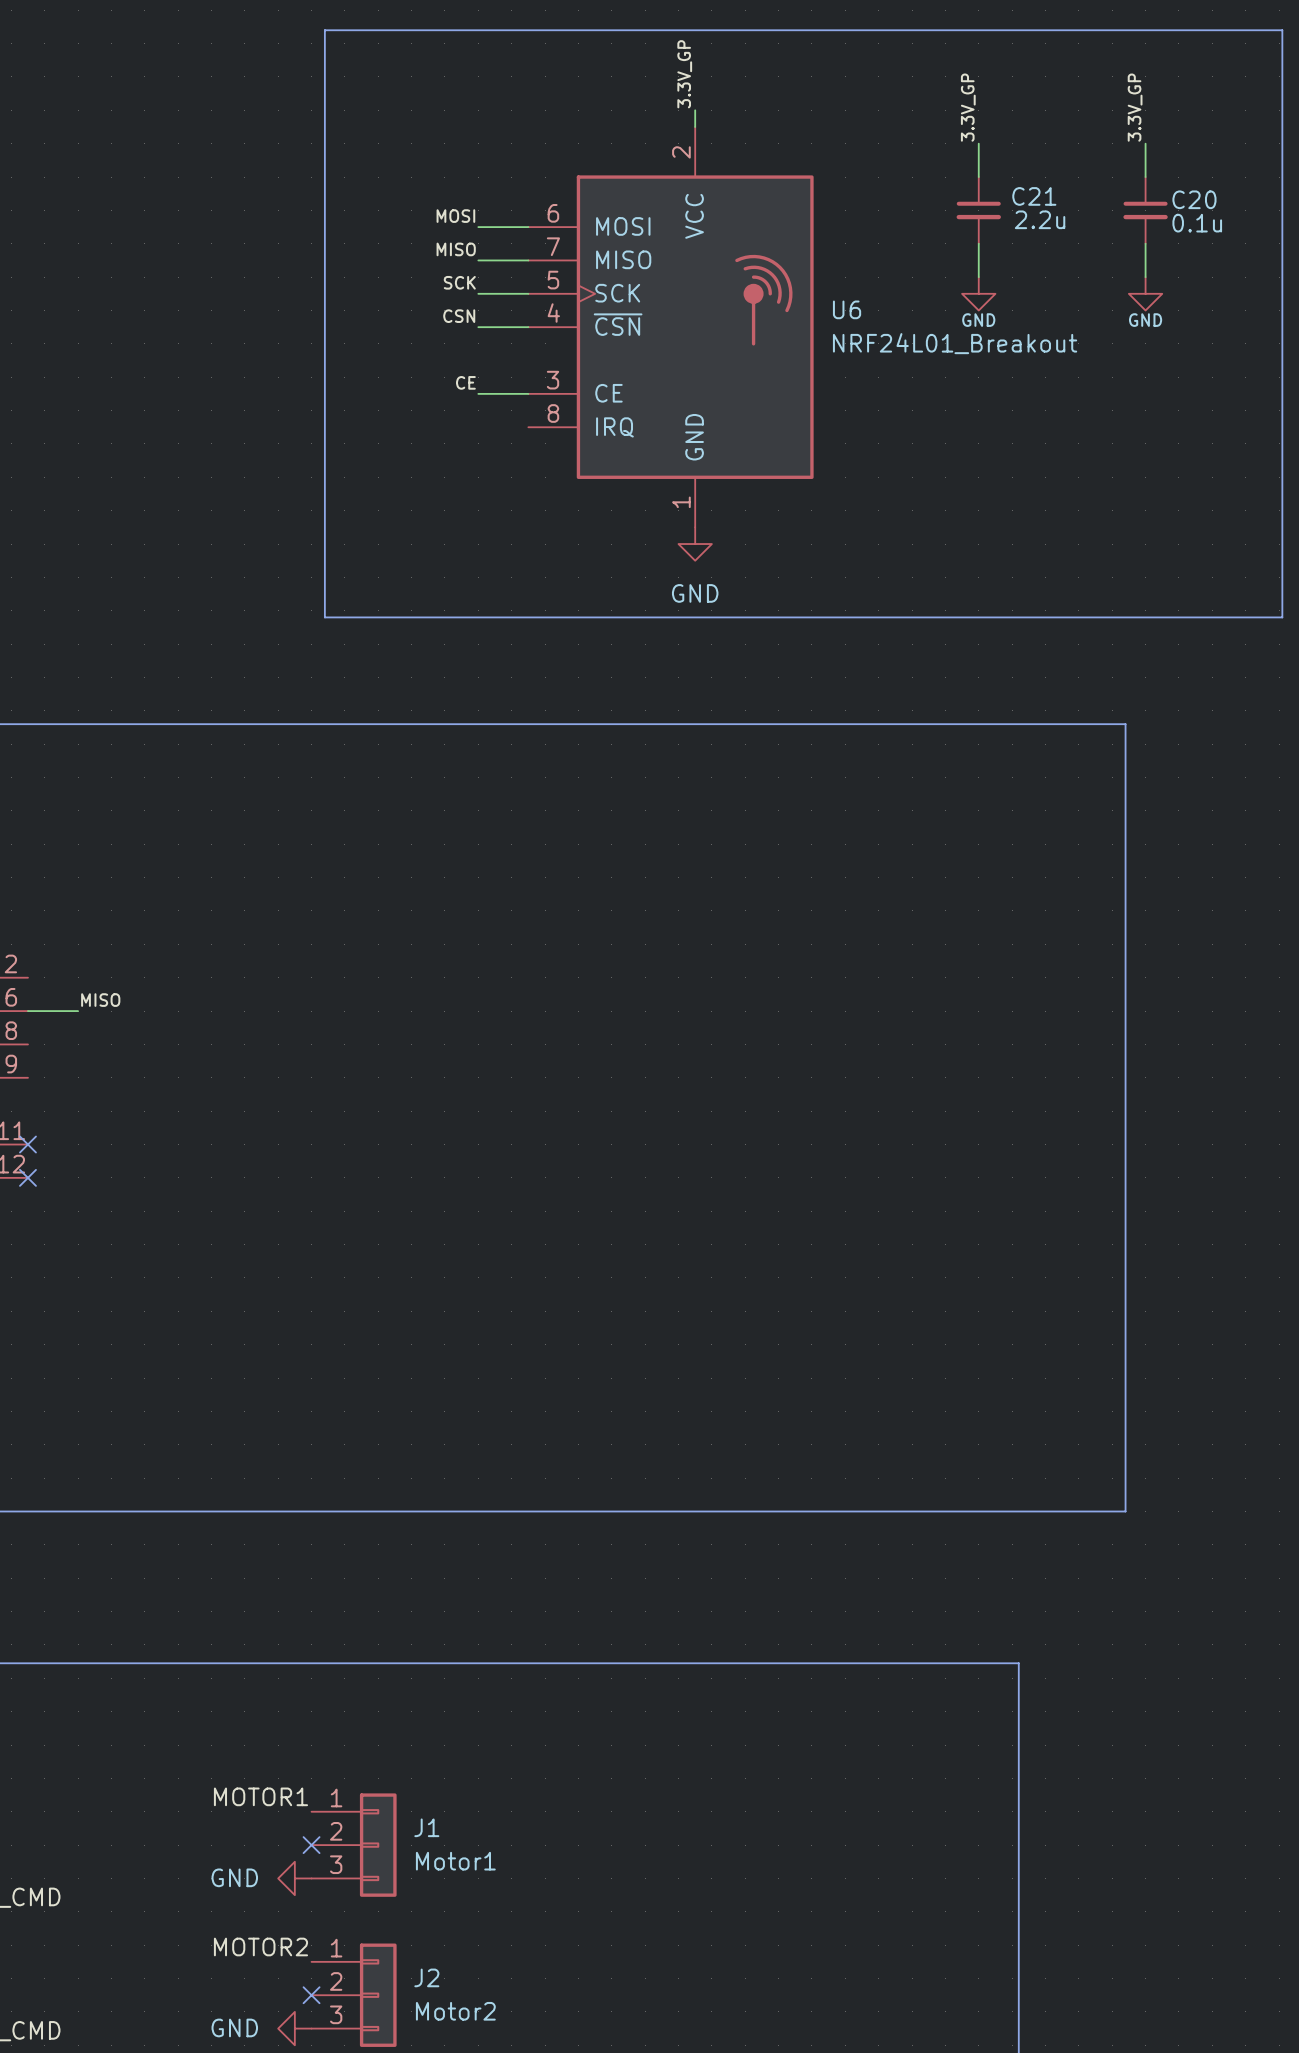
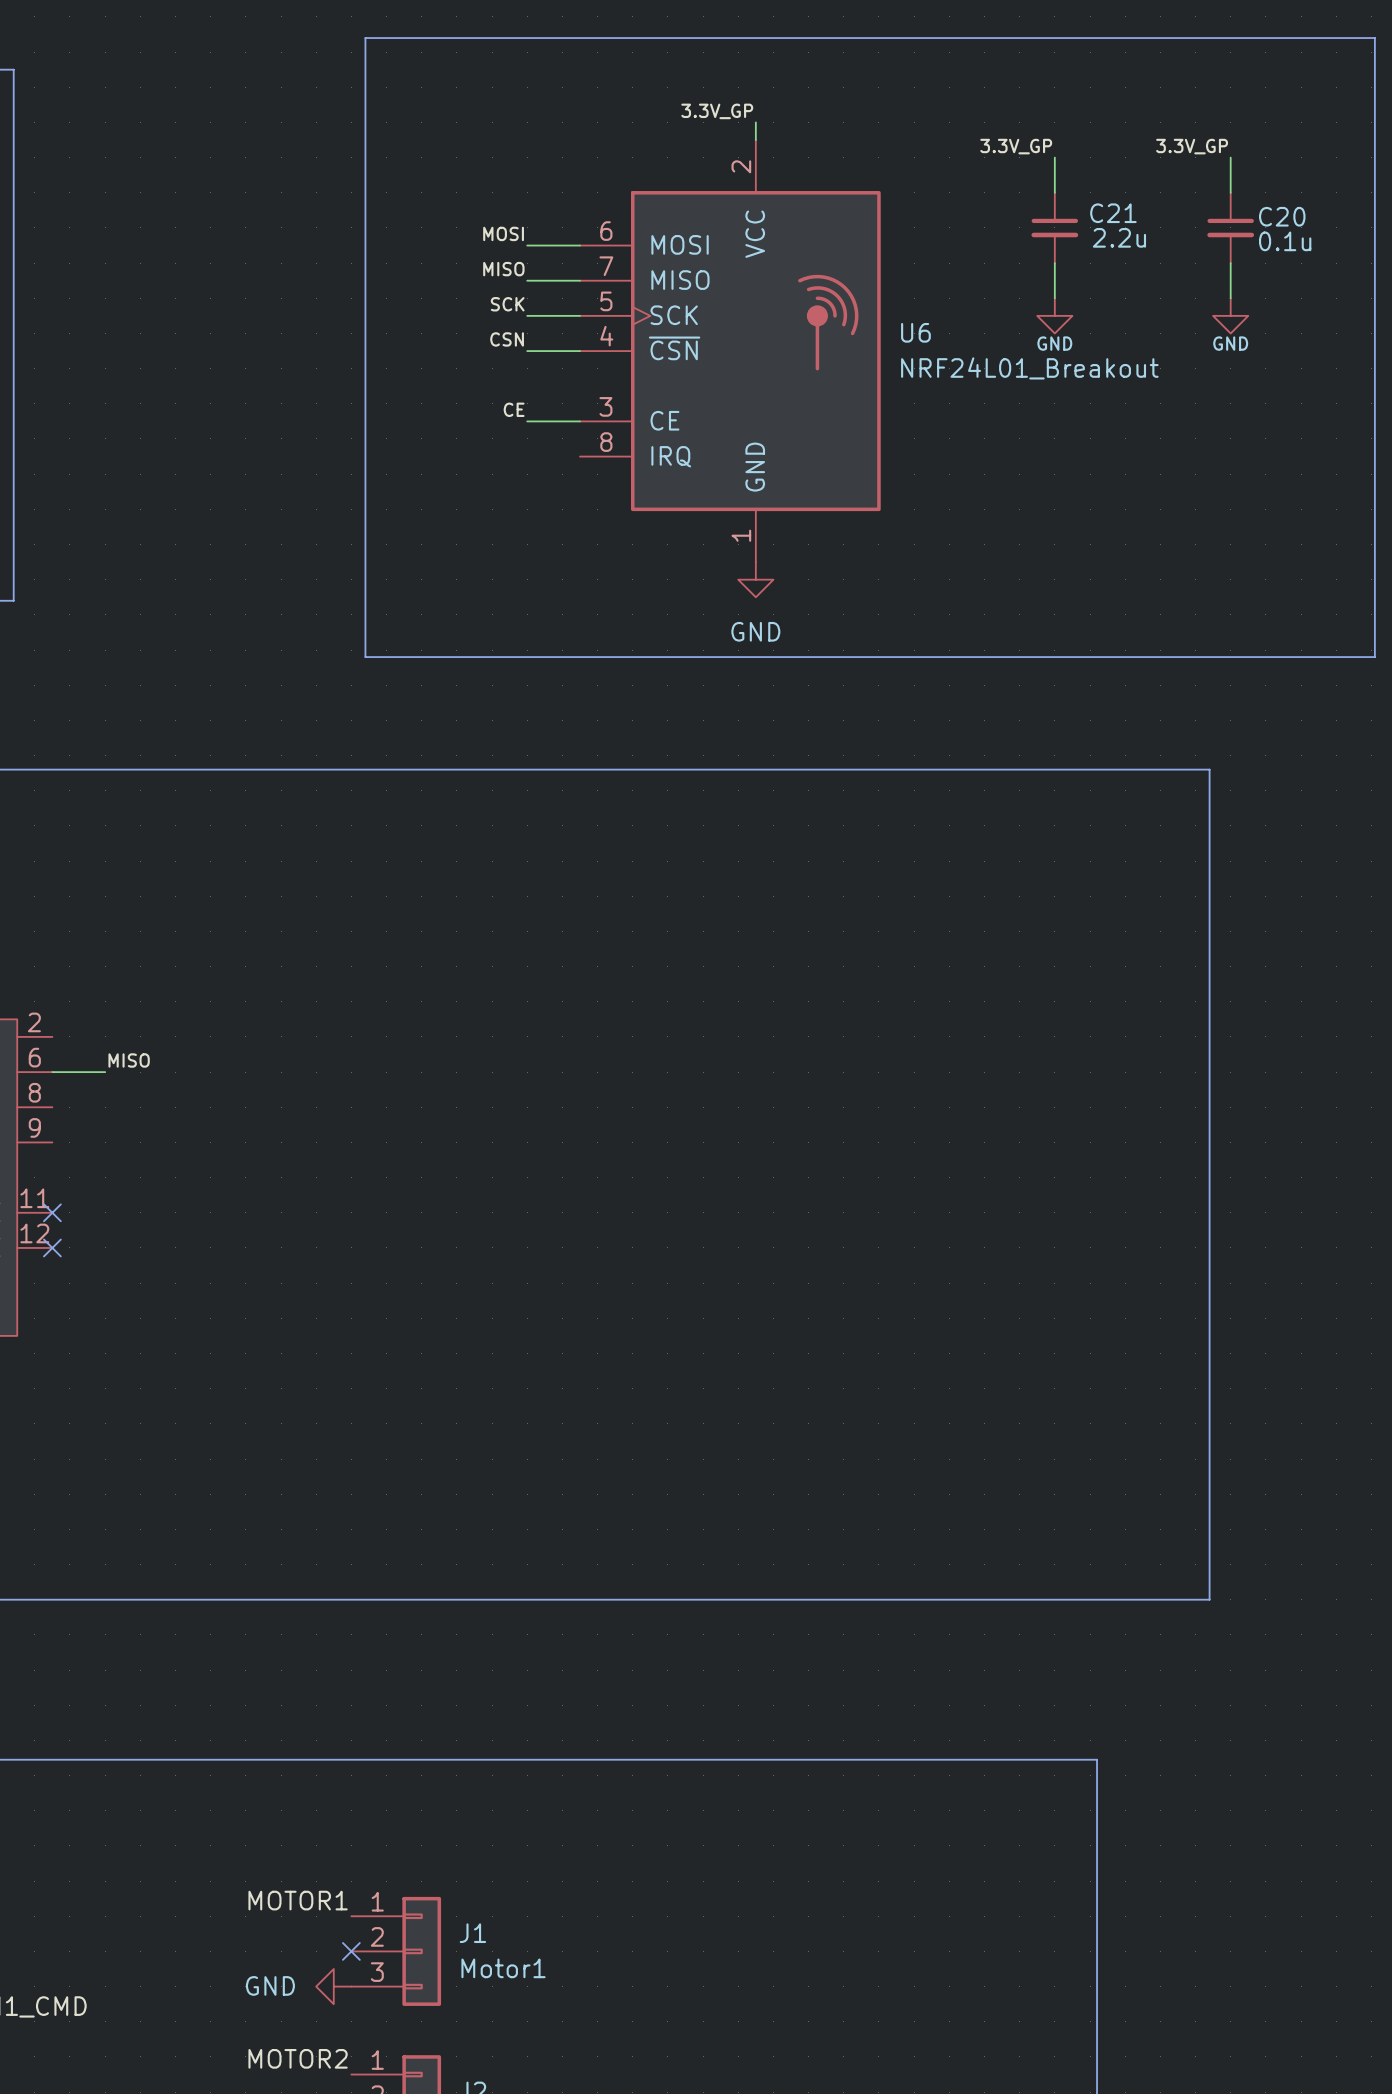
label rotation: 0° (684, 74) -> 90° clockwise (717, 111)
label rotation: 0° (968, 107) -> 90° clockwise (1016, 146)
label rotation: 0° (1135, 107) -> 90° clockwise (1192, 146)

